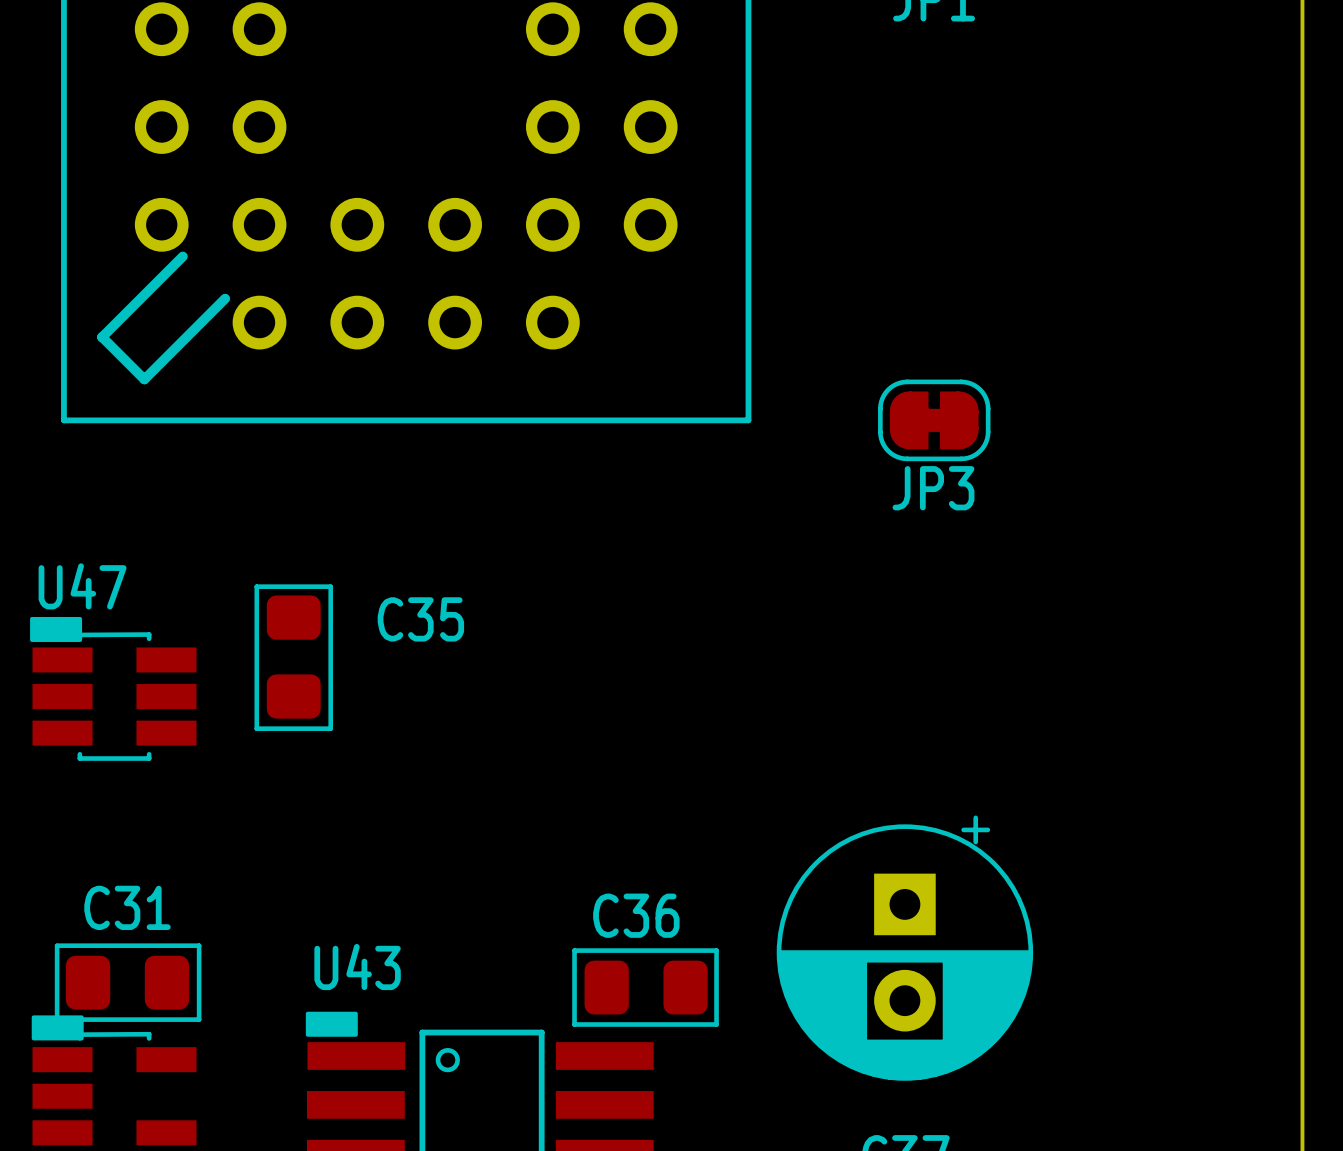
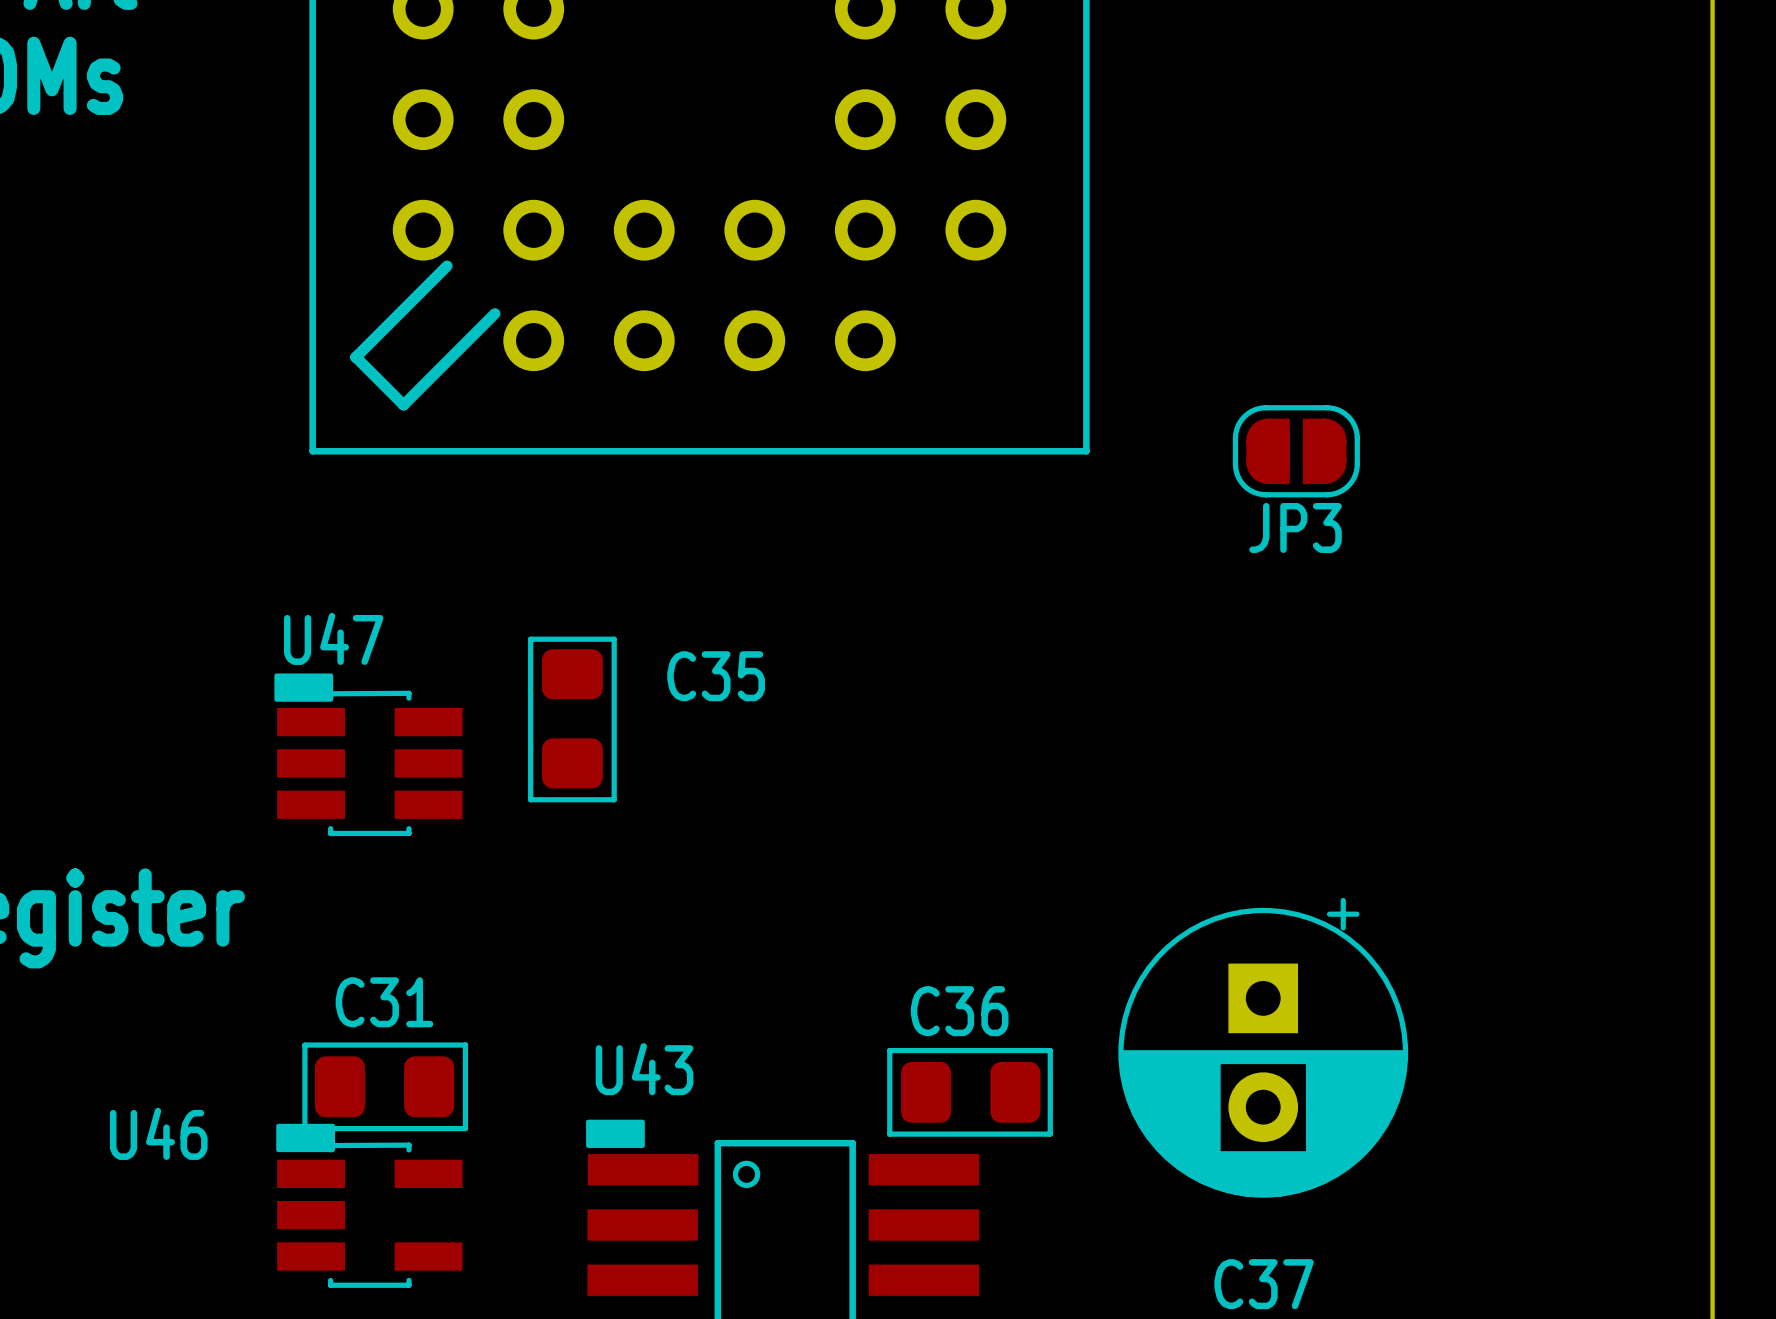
JP3 footprint: [878, 379, 991, 462] -> [1232, 405, 1360, 498]

